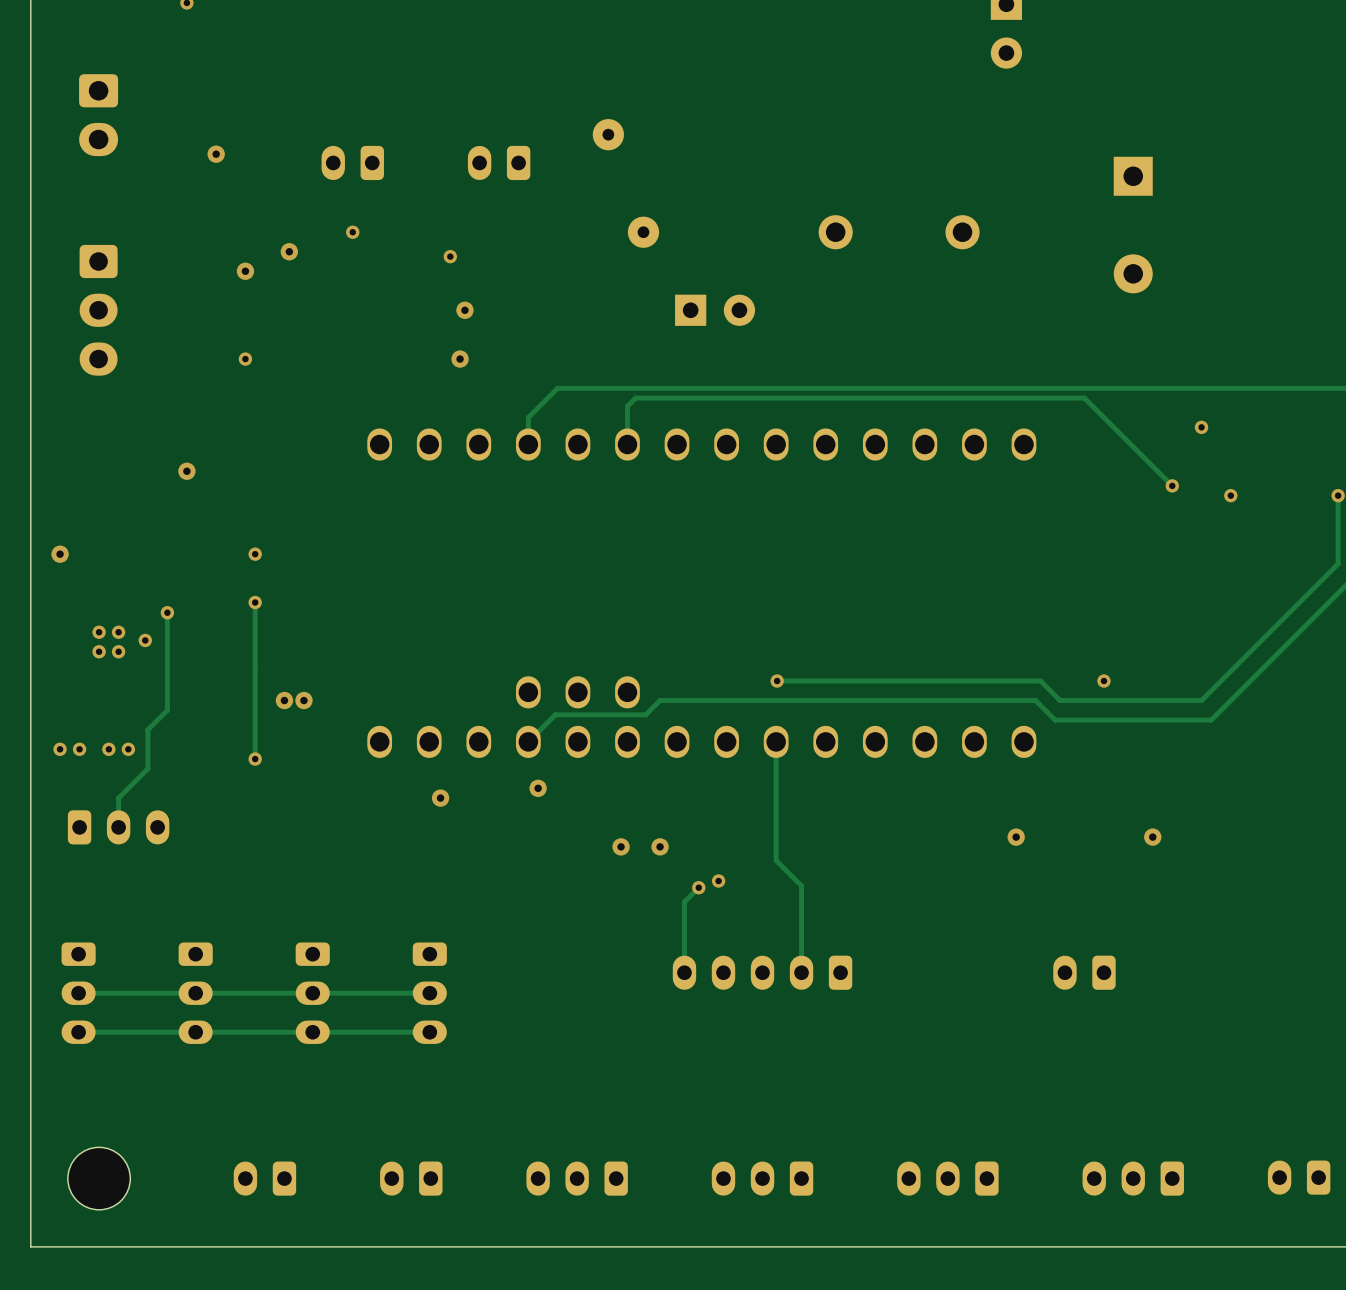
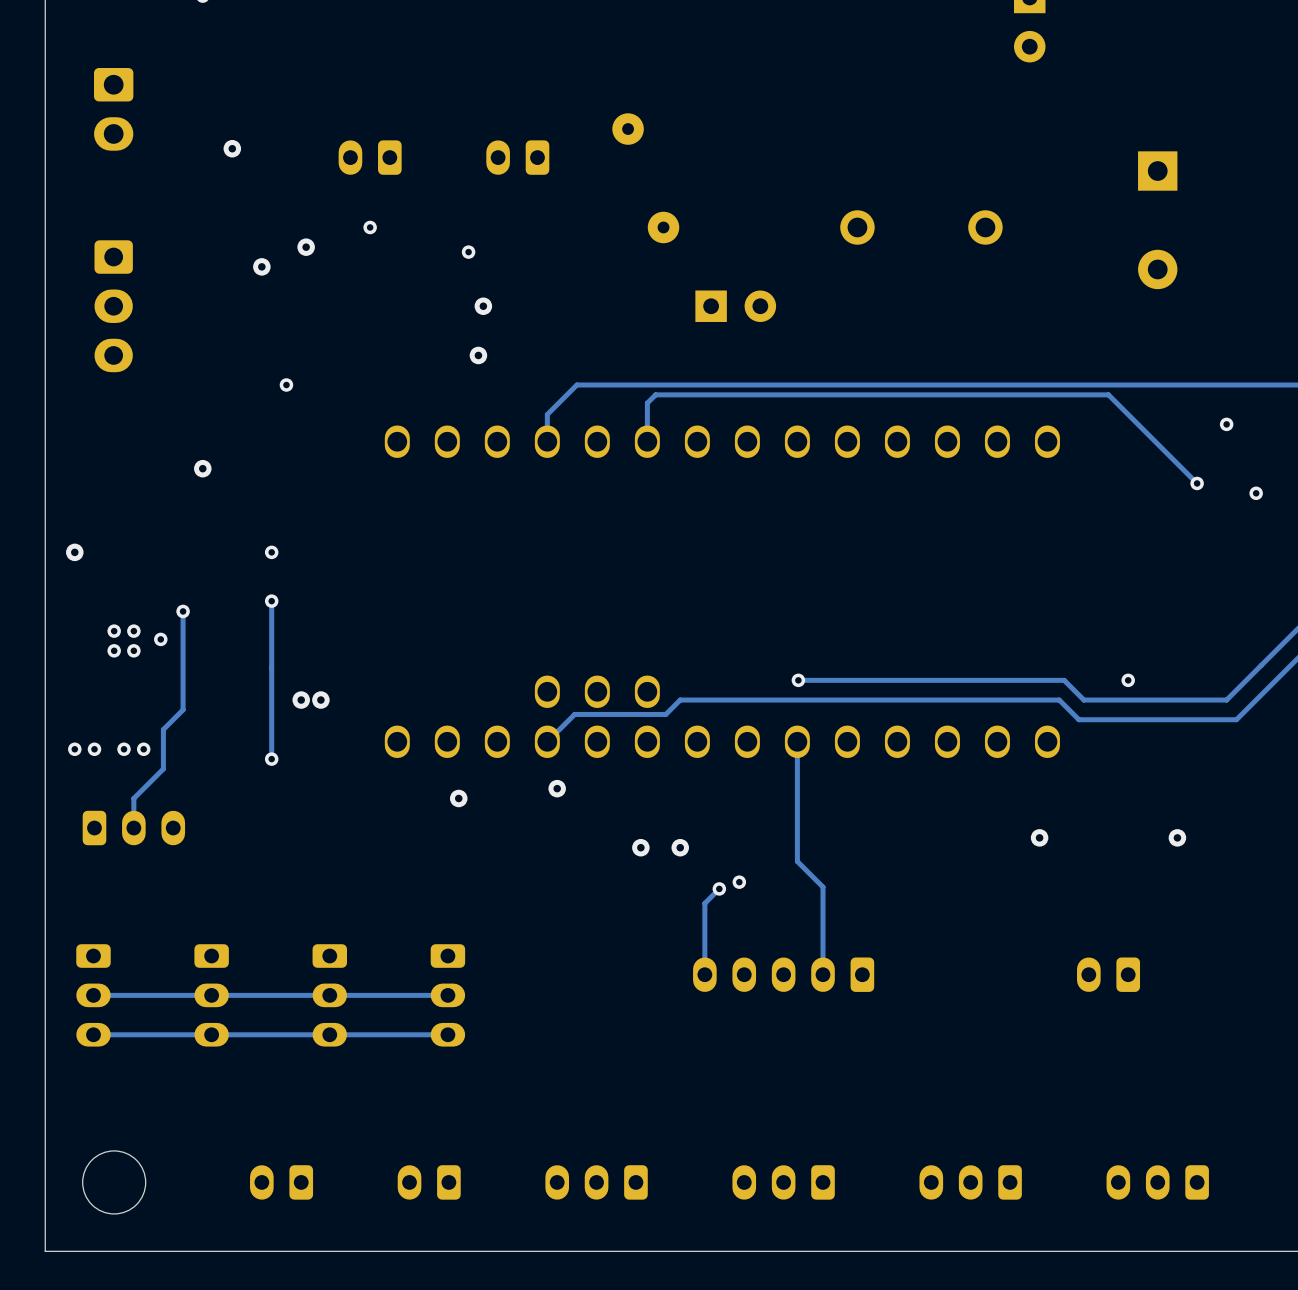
via position: (245, 359) -> (286, 385)

